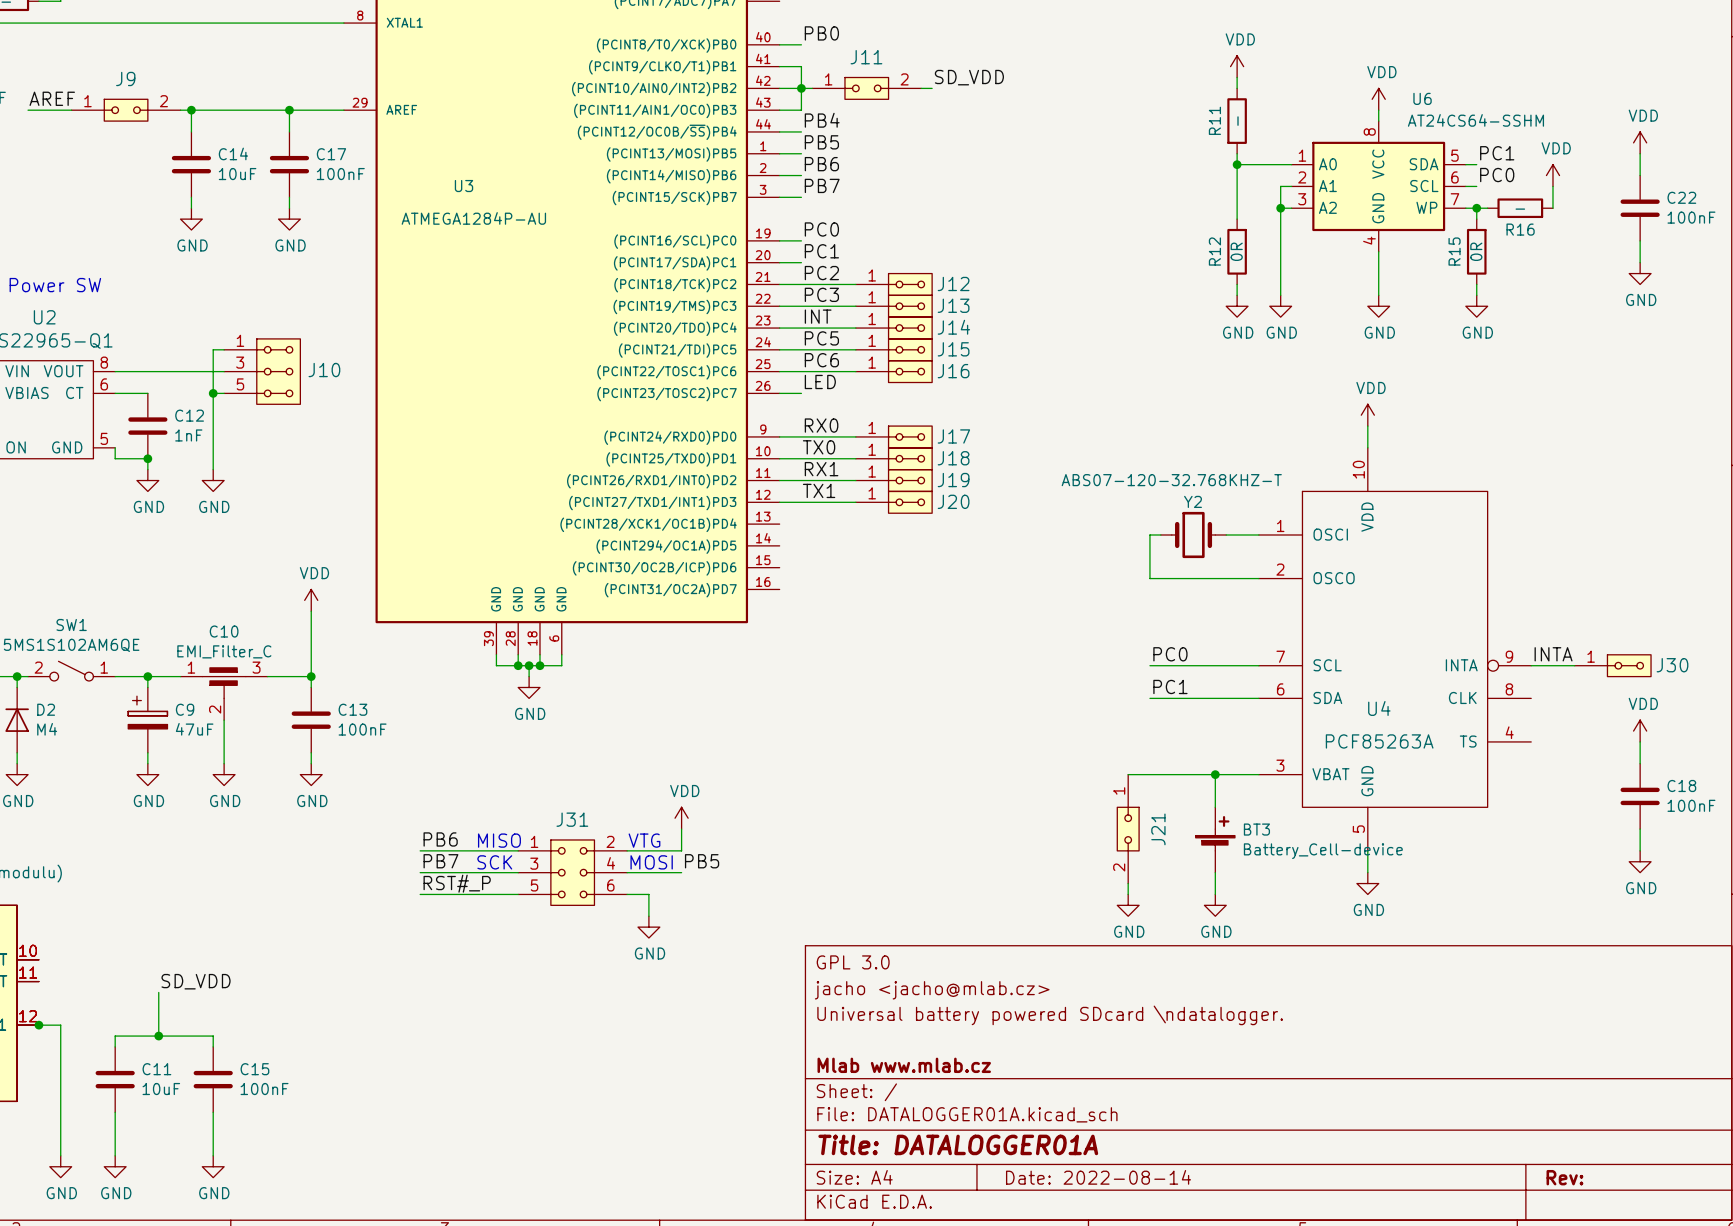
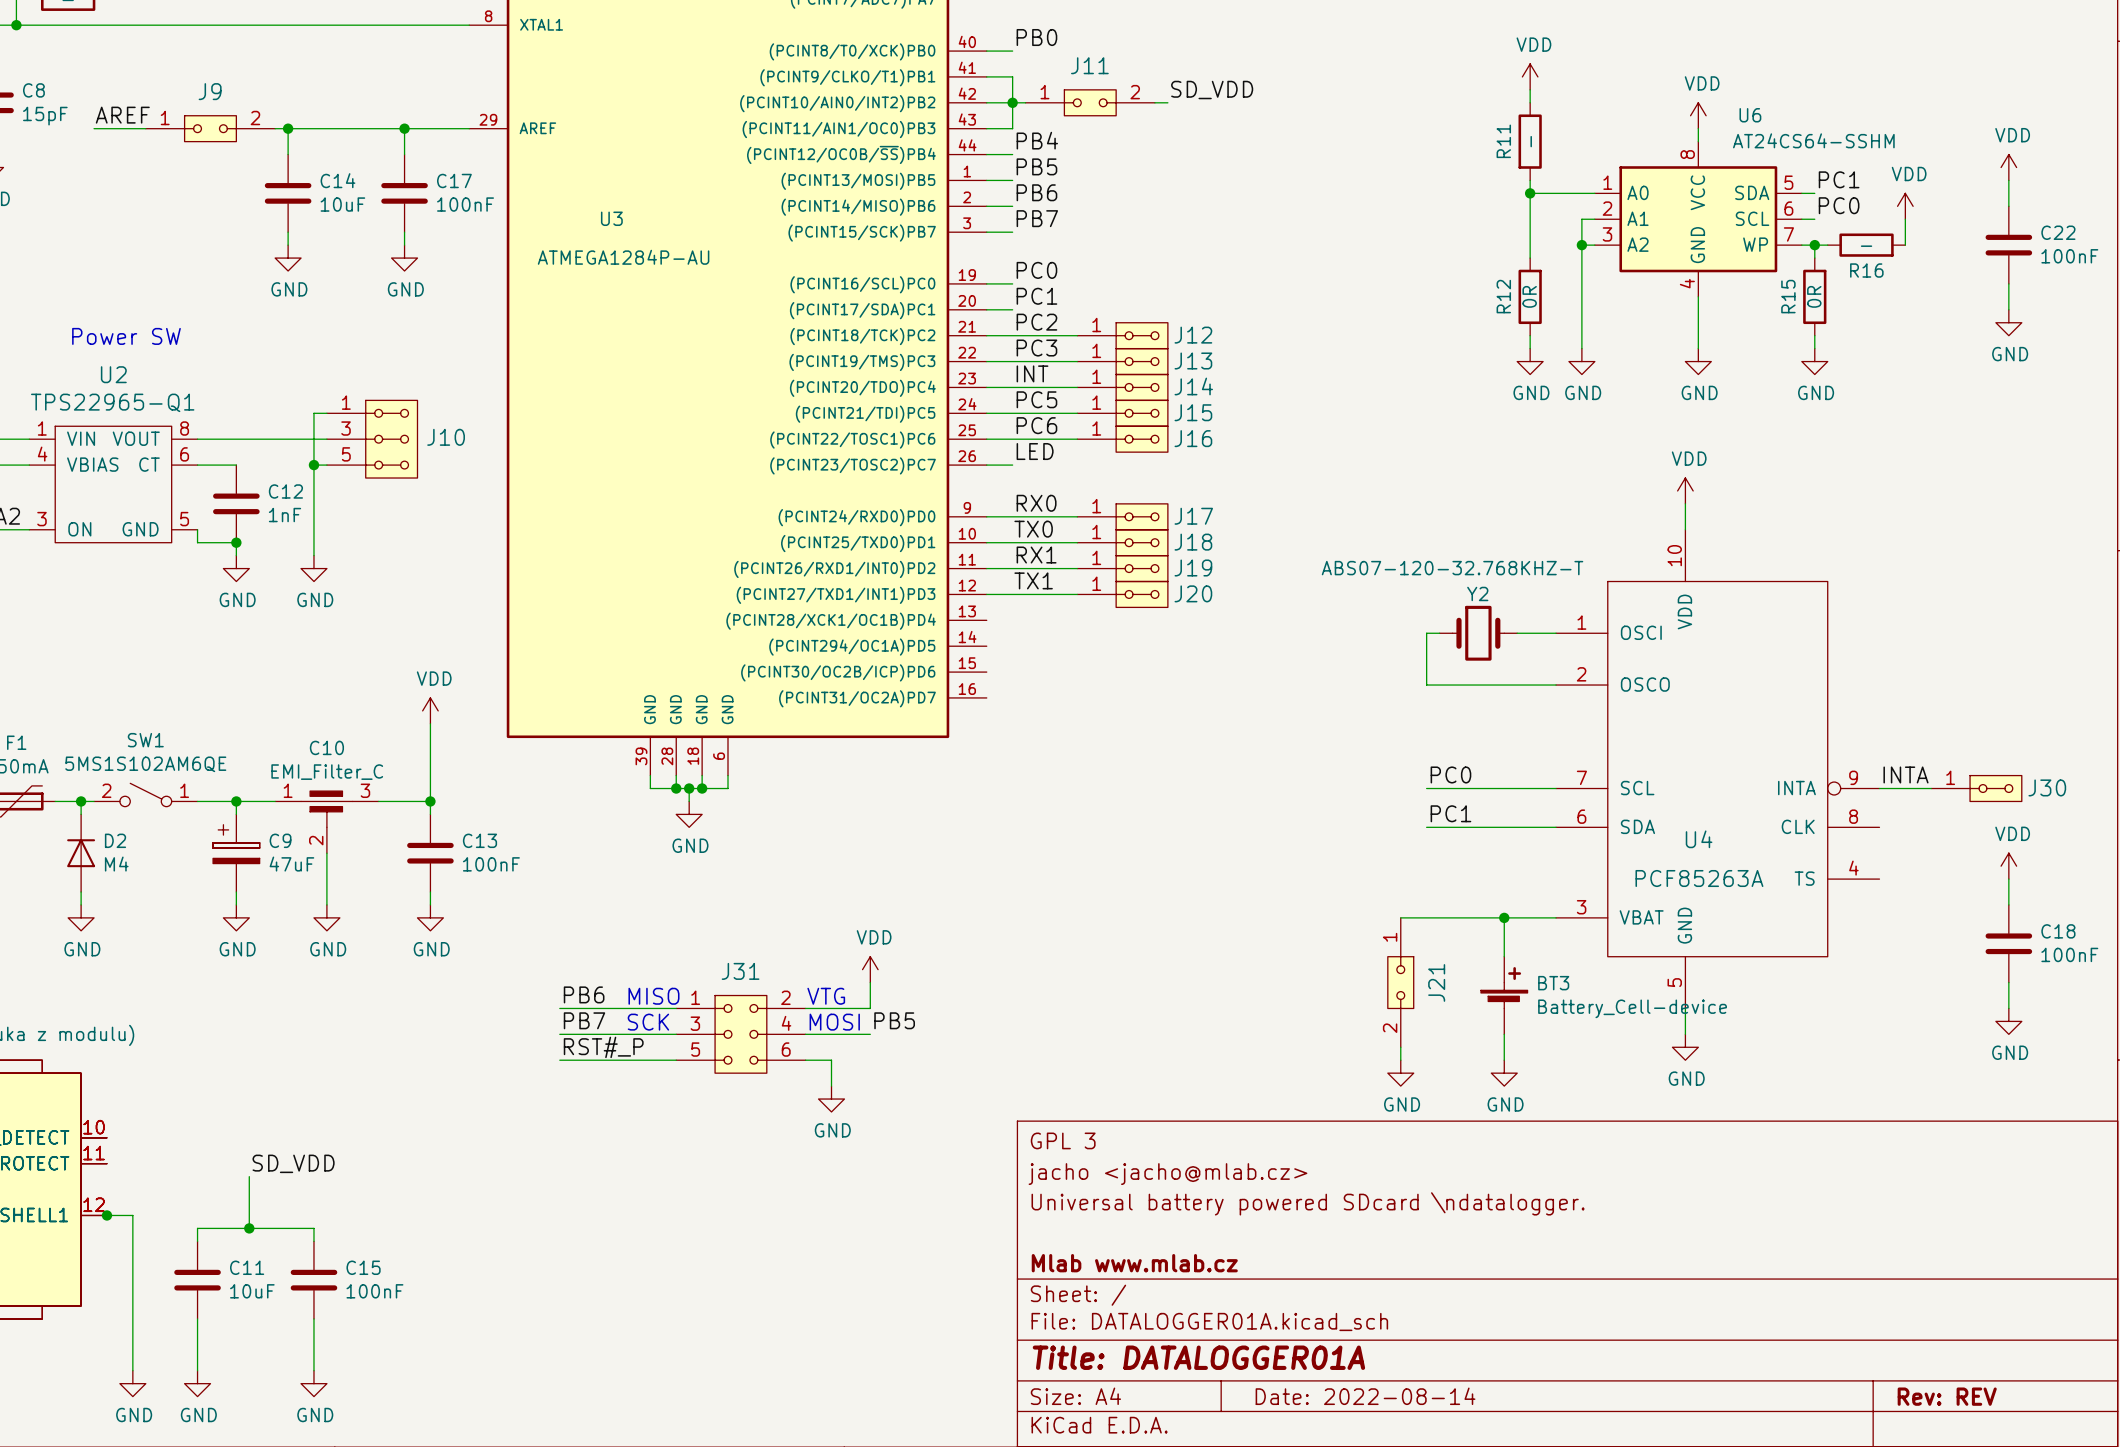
title block: GPL 3.0 (853, 962) -> GPL 3 (1063, 1140)
title block: Rev: (1564, 1177) -> Rev: REV (1947, 1396)

